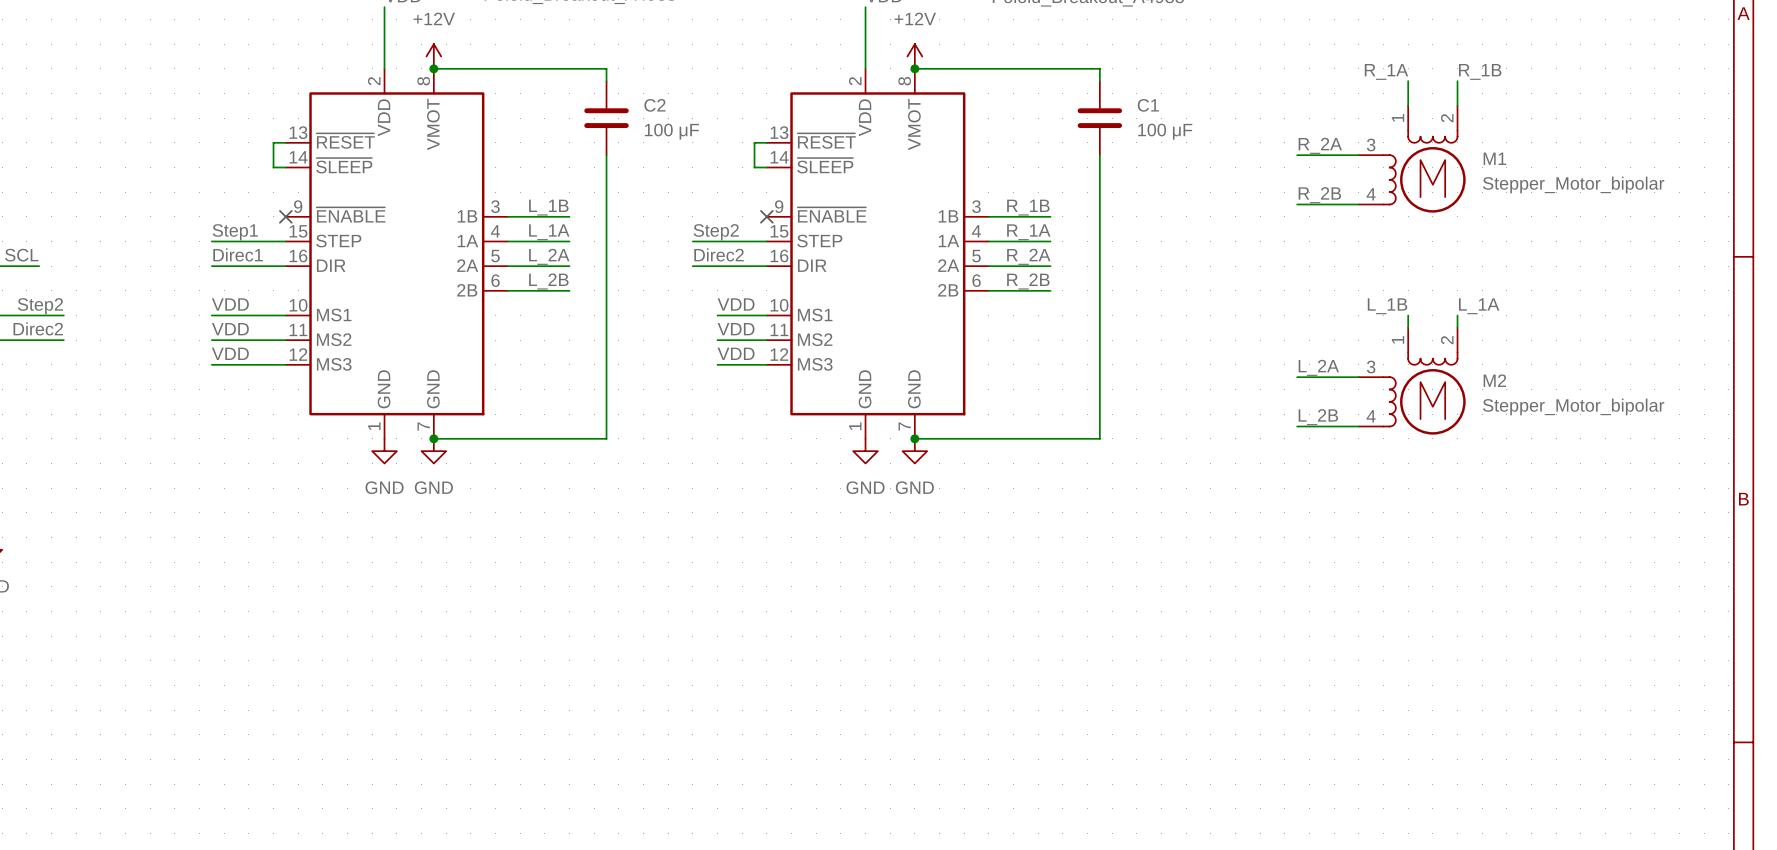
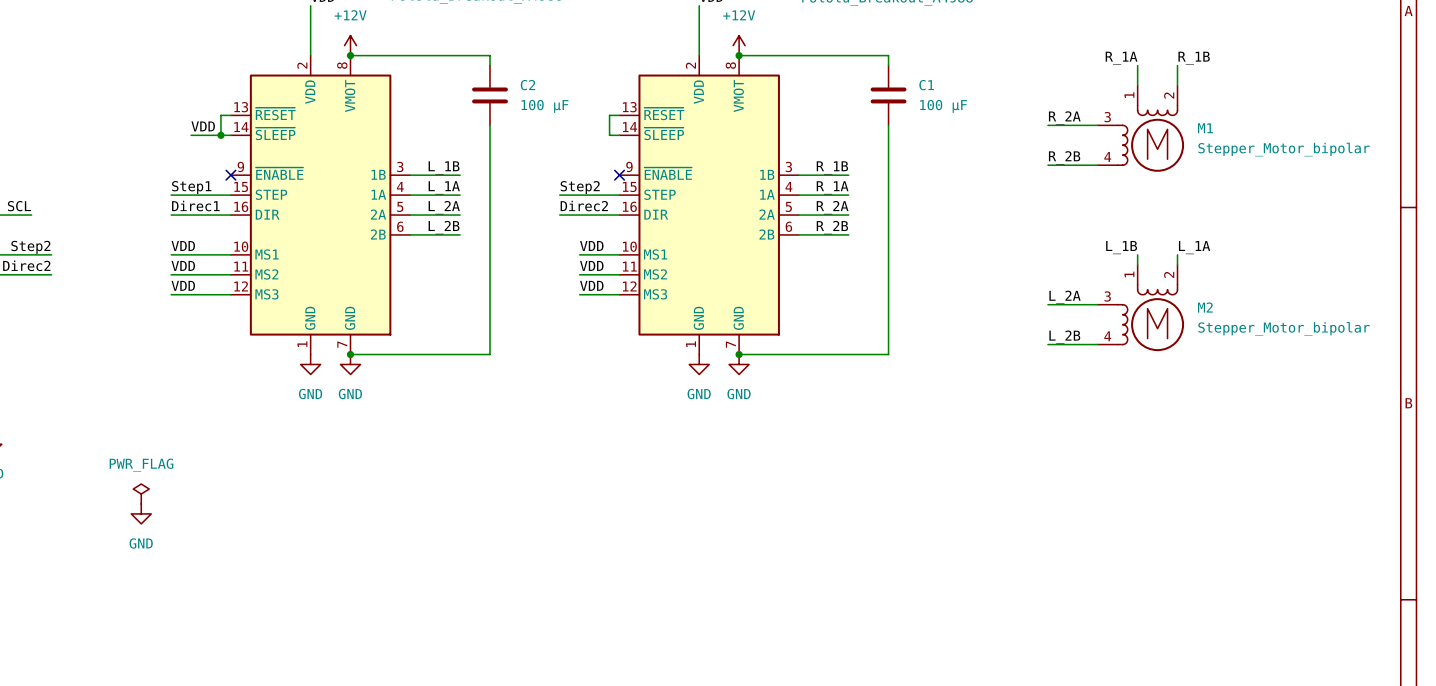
label: none -> VDD (203, 126)
wire: none -> (191, 135) (220, 135)
junction: none -> (220, 135)
power symbol: none -> PWR_FLAG (141, 494)
power symbol: none -> GND (141, 513)

